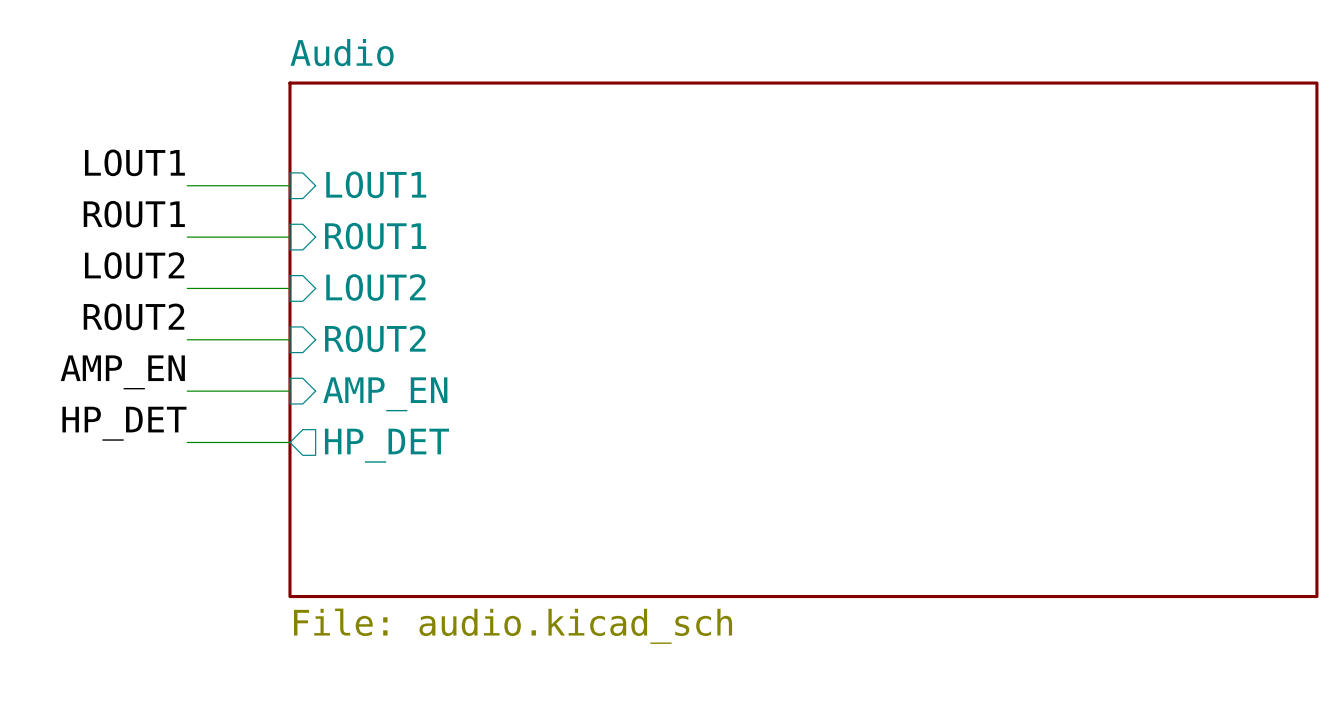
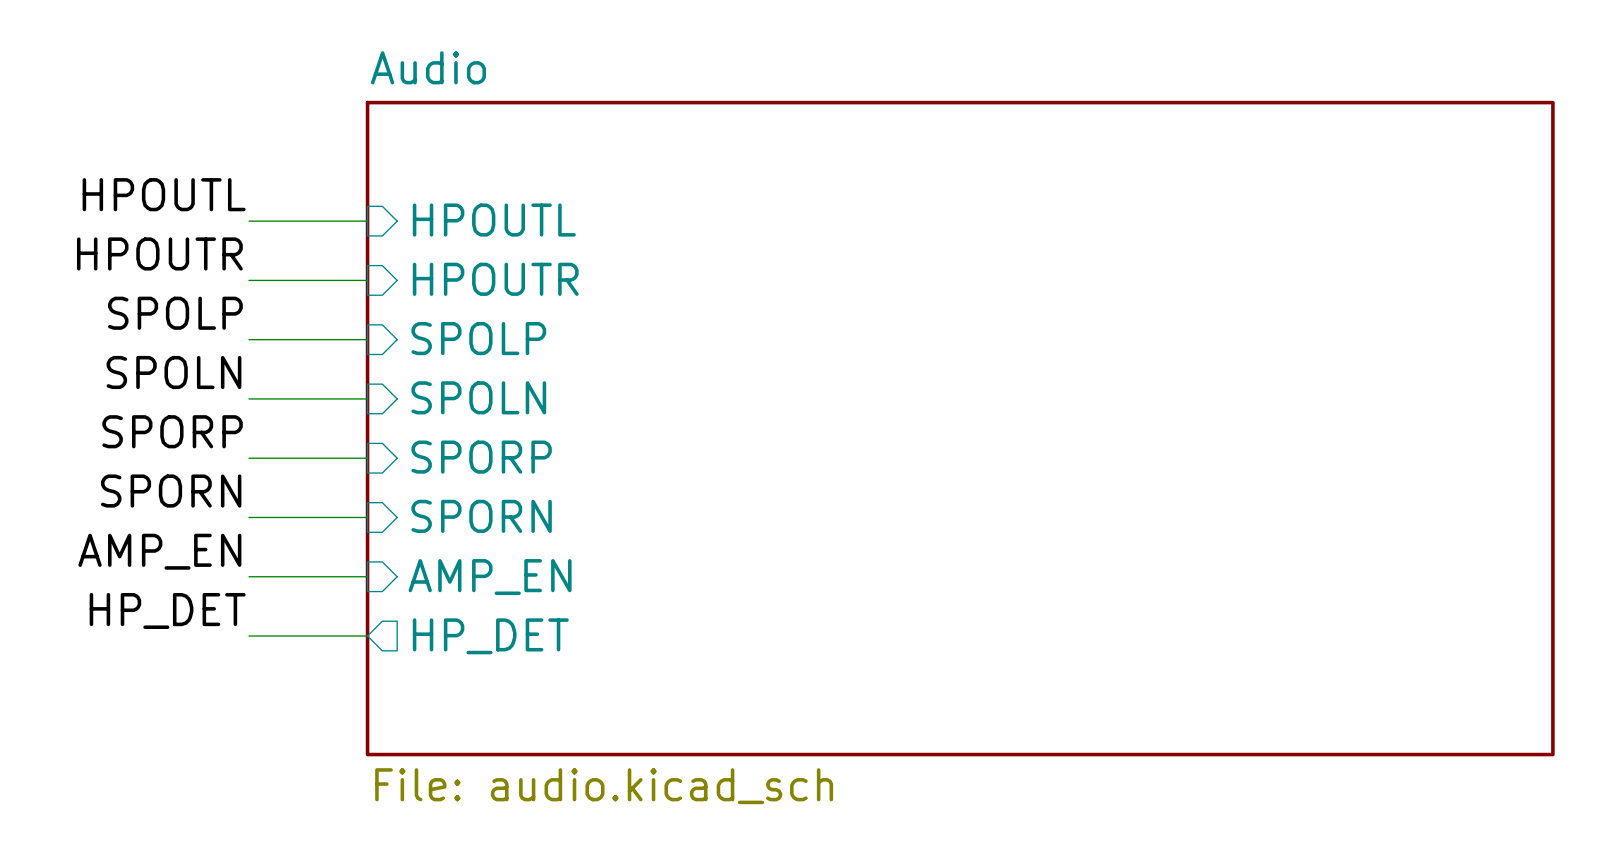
label: LOUT1 (134, 162) -> HPOUTL (164, 194)
sheet pin: LOUT1 (376, 184) -> HPOUTL (494, 220)
label: ROUT1 (134, 214) -> HPOUTR (159, 253)
sheet pin: ROUT1 (375, 236) -> HPOUTR (495, 279)
label: LOUT2 (134, 265) -> SPOLP (175, 313)
sheet pin: LOUT2 (375, 287) -> SPOLP (478, 338)
label: ROUT2 (134, 316) -> SPOLN (174, 372)
sheet pin: ROUT2 (375, 338) -> SPOLN (478, 397)
sheet Audio: File: audio.kicad_sch (803, 339) -> none
sheet Audio: none -> File: audio.kicad_sch (960, 428)
label: AMP_EN (122, 372) -> SPORP (172, 431)
sheet pin: AMP_EN (385, 394) -> SPORP (481, 457)
label: HP_DET (124, 423) -> SPORN (171, 491)
sheet pin shape: output (386, 445) -> input (481, 516)
sheet pin: HP_DET (386, 445) -> SPORN (481, 516)
label: none -> AMP_EN (159, 551)
wire: none -> (249, 576) (367, 576)
sheet pin: none -> AMP_EN (490, 577)
label: none -> HP_DET (167, 610)
wire: none -> (249, 636) (367, 636)
sheet pin: none -> HP_DET (490, 636)

